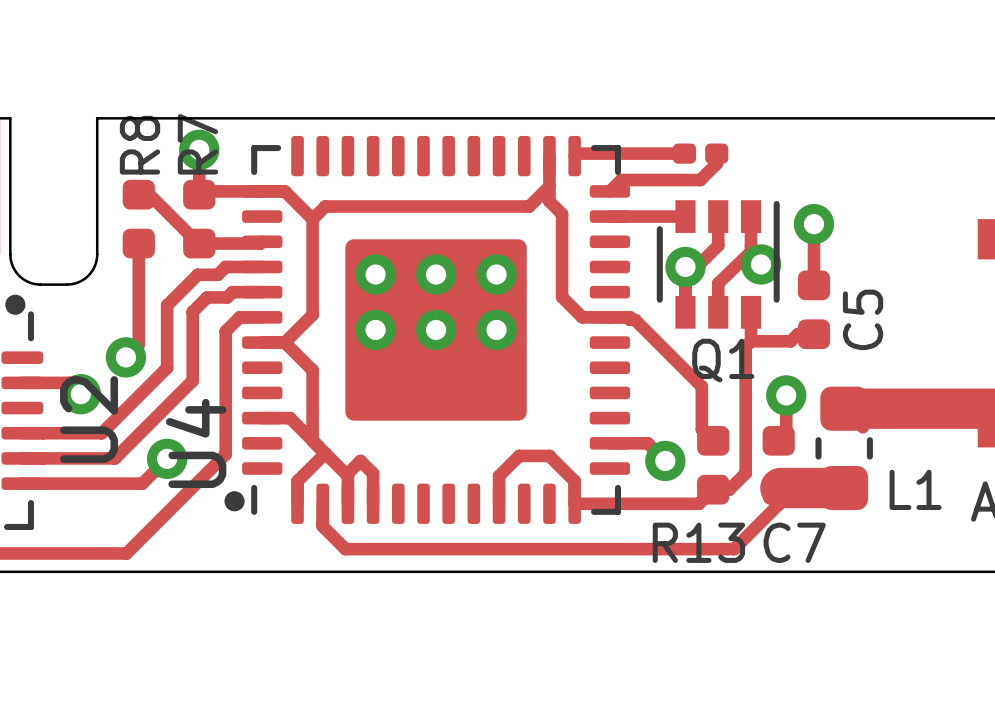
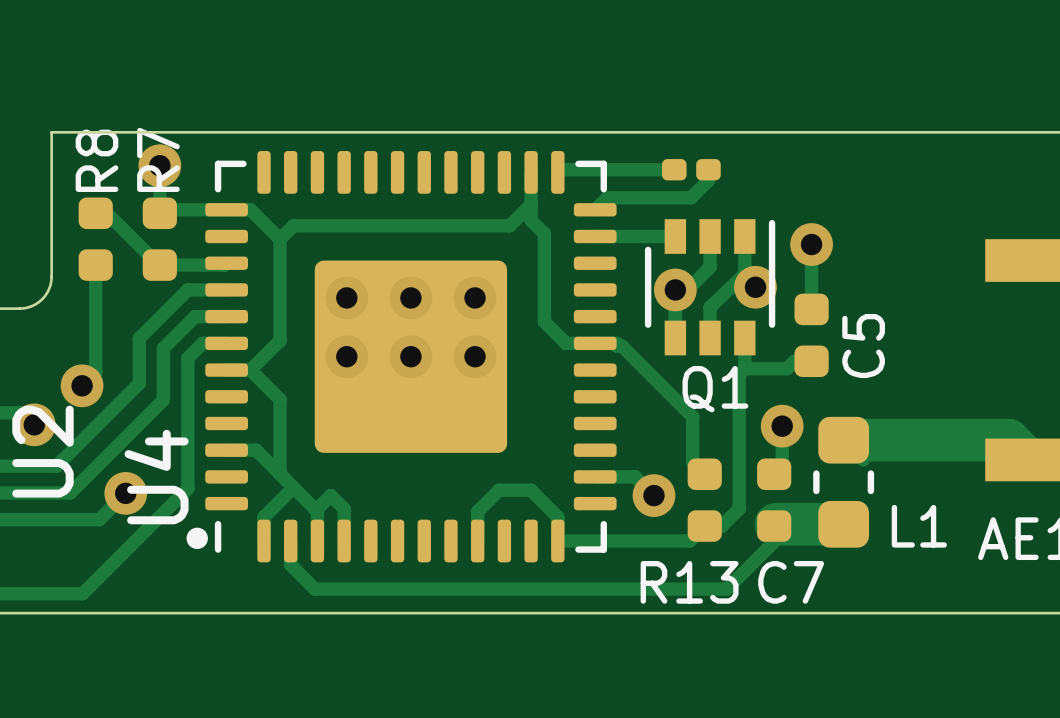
track: (217, 274) (197, 274) (167, 305) (167, 367) -> (179, 298) (139, 338) (139, 383) (125, 396)
track: (227, 297) (207, 297) (192, 311) (192, 380) -> (189, 322) (163, 348) (163, 400) (152, 410)

